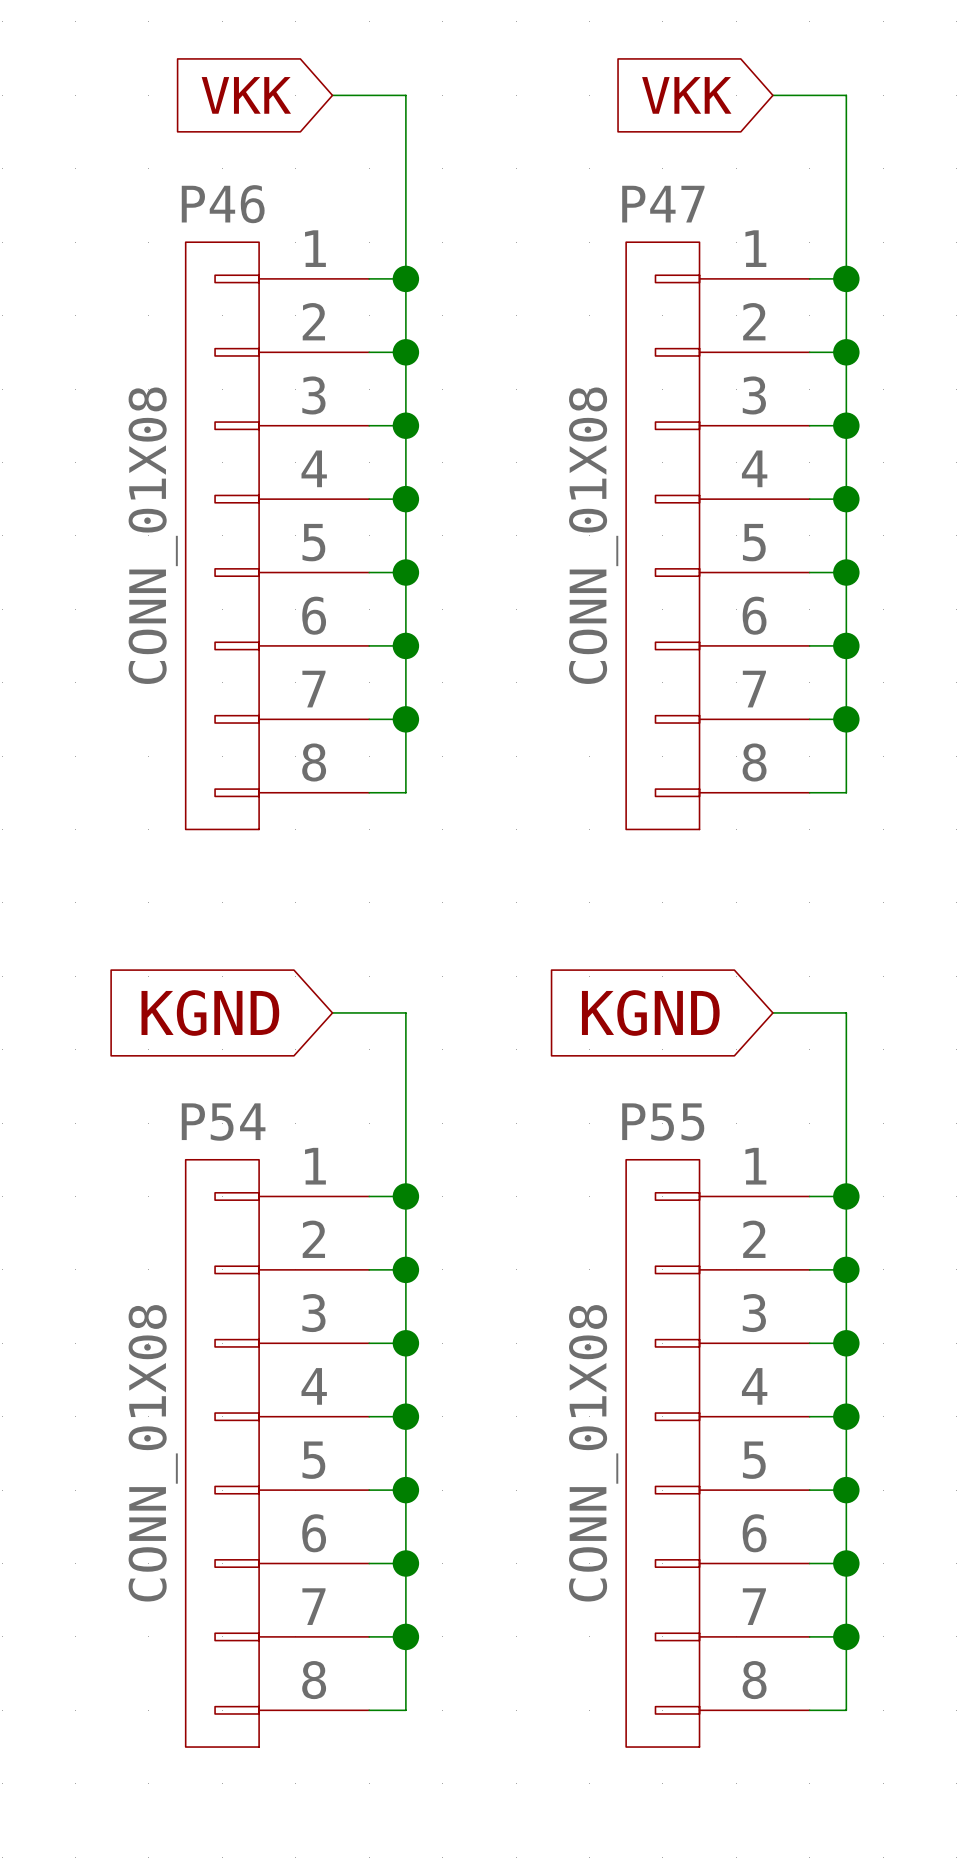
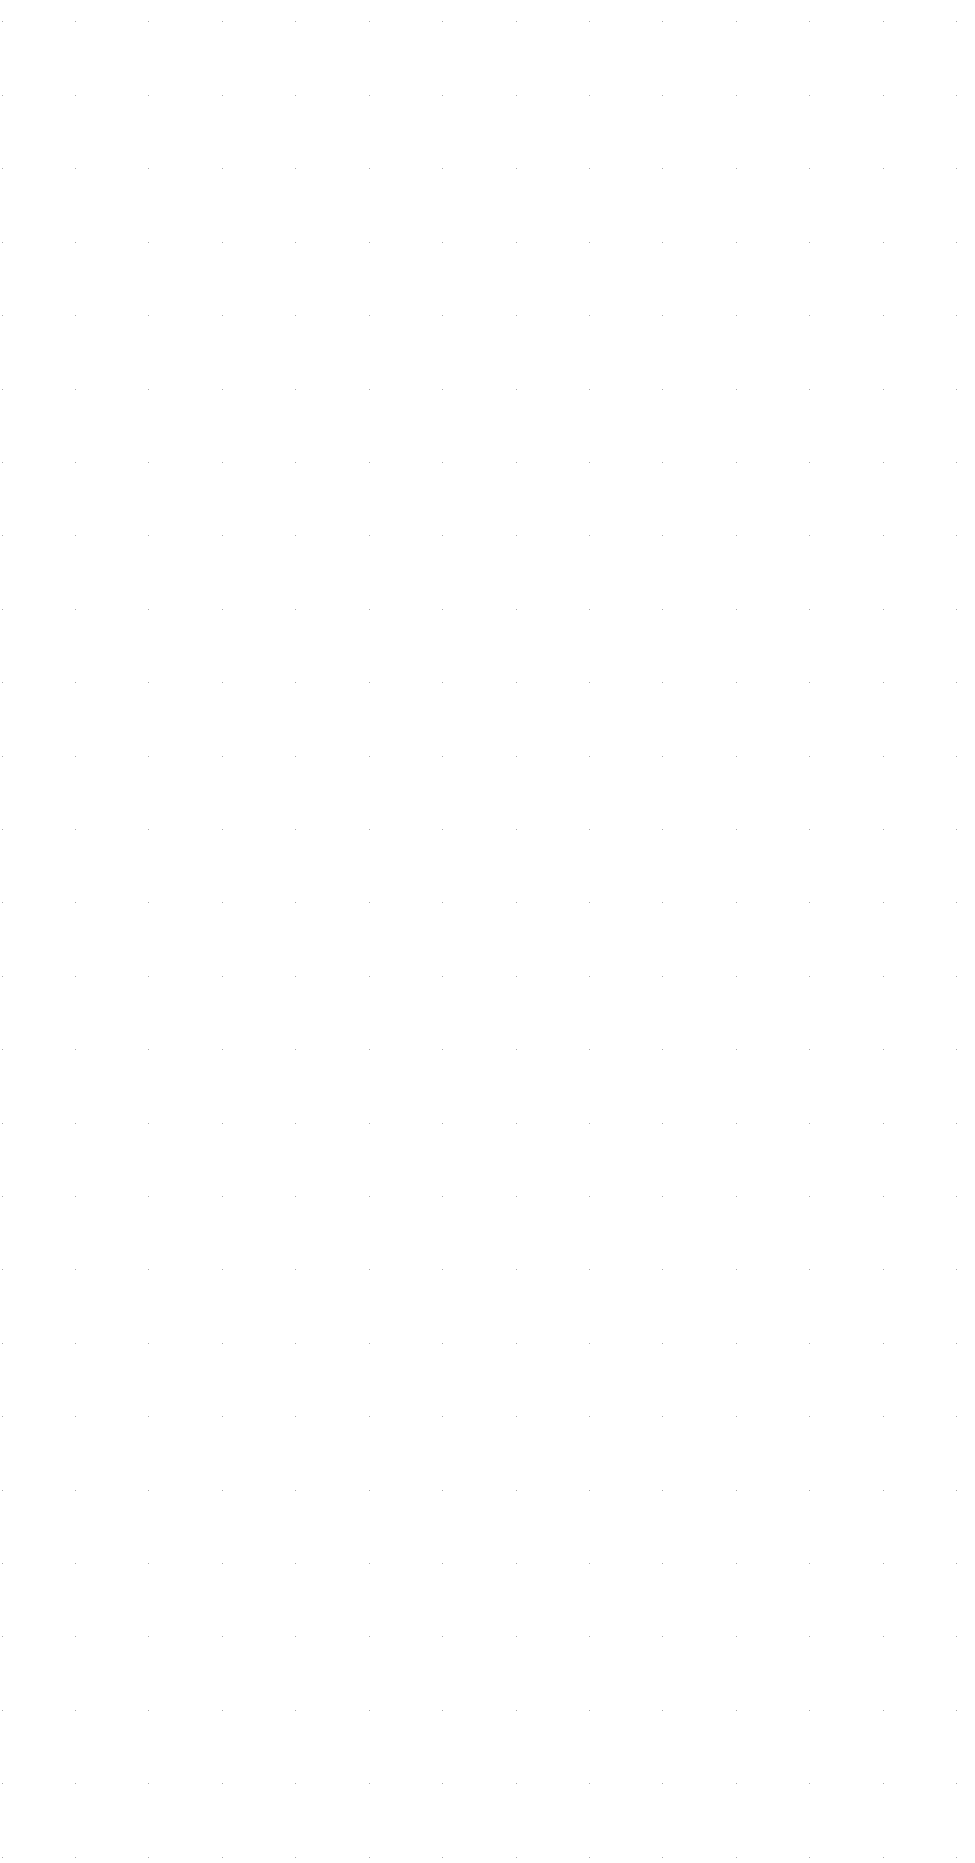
global label: VKK (246, 95) -> none
wire: (332, 95) (405, 95) (405, 792) (369, 792) -> none
global label: VKK (686, 95) -> none
wire: (772, 95) (846, 95) (846, 792) (809, 792) -> none
wire: (369, 278) (405, 278) -> none
junction: (405, 278) -> none
wire: (809, 278) (846, 278) -> none
junction: (846, 278) -> none
wire: (369, 352) (405, 352) -> none
junction: (405, 352) -> none
wire: (809, 352) (846, 352) -> none
junction: (846, 352) -> none
wire: (369, 425) (405, 425) -> none
junction: (405, 425) -> none
wire: (809, 425) (846, 425) -> none
junction: (846, 425) -> none
wire: (369, 499) (405, 499) -> none
junction: (405, 499) -> none
wire: (809, 499) (846, 499) -> none
junction: (846, 499) -> none
P46: CONN_01X08 (277, 535) -> none
P47: CONN_01X08 (717, 535) -> none
wire: (369, 572) (405, 572) -> none
junction: (405, 572) -> none
wire: (809, 572) (846, 572) -> none
junction: (846, 572) -> none
wire: (369, 645) (405, 645) -> none
junction: (405, 645) -> none
wire: (809, 645) (846, 645) -> none
junction: (846, 645) -> none
wire: (369, 719) (405, 719) -> none
junction: (405, 719) -> none
wire: (809, 719) (846, 719) -> none
junction: (846, 719) -> none
wire: (332, 1012) (405, 1012) (405, 1710) (369, 1710) -> none
wire: (772, 1012) (846, 1012) (846, 1710) (809, 1710) -> none
global label: KGND (210, 1013) -> none
global label: KGND (650, 1013) -> none
wire: (369, 1196) (405, 1196) -> none
junction: (405, 1196) -> none
wire: (809, 1196) (846, 1196) -> none
junction: (846, 1196) -> none
wire: (369, 1269) (405, 1269) -> none
junction: (405, 1269) -> none
wire: (809, 1269) (846, 1269) -> none
junction: (846, 1269) -> none
wire: (369, 1343) (405, 1343) -> none
junction: (405, 1343) -> none
wire: (809, 1343) (846, 1343) -> none
junction: (846, 1343) -> none
wire: (369, 1416) (405, 1416) -> none
junction: (405, 1416) -> none
wire: (809, 1416) (846, 1416) -> none
junction: (846, 1416) -> none
P54: CONN_01X08 (277, 1453) -> none
P55: CONN_01X08 (717, 1453) -> none
wire: (369, 1490) (405, 1490) -> none
junction: (405, 1490) -> none
wire: (809, 1490) (846, 1490) -> none
junction: (846, 1490) -> none
wire: (369, 1563) (405, 1563) -> none
junction: (405, 1563) -> none
wire: (809, 1563) (846, 1563) -> none
junction: (846, 1563) -> none
wire: (369, 1636) (405, 1636) -> none
junction: (405, 1636) -> none
wire: (809, 1636) (846, 1636) -> none
junction: (846, 1636) -> none

